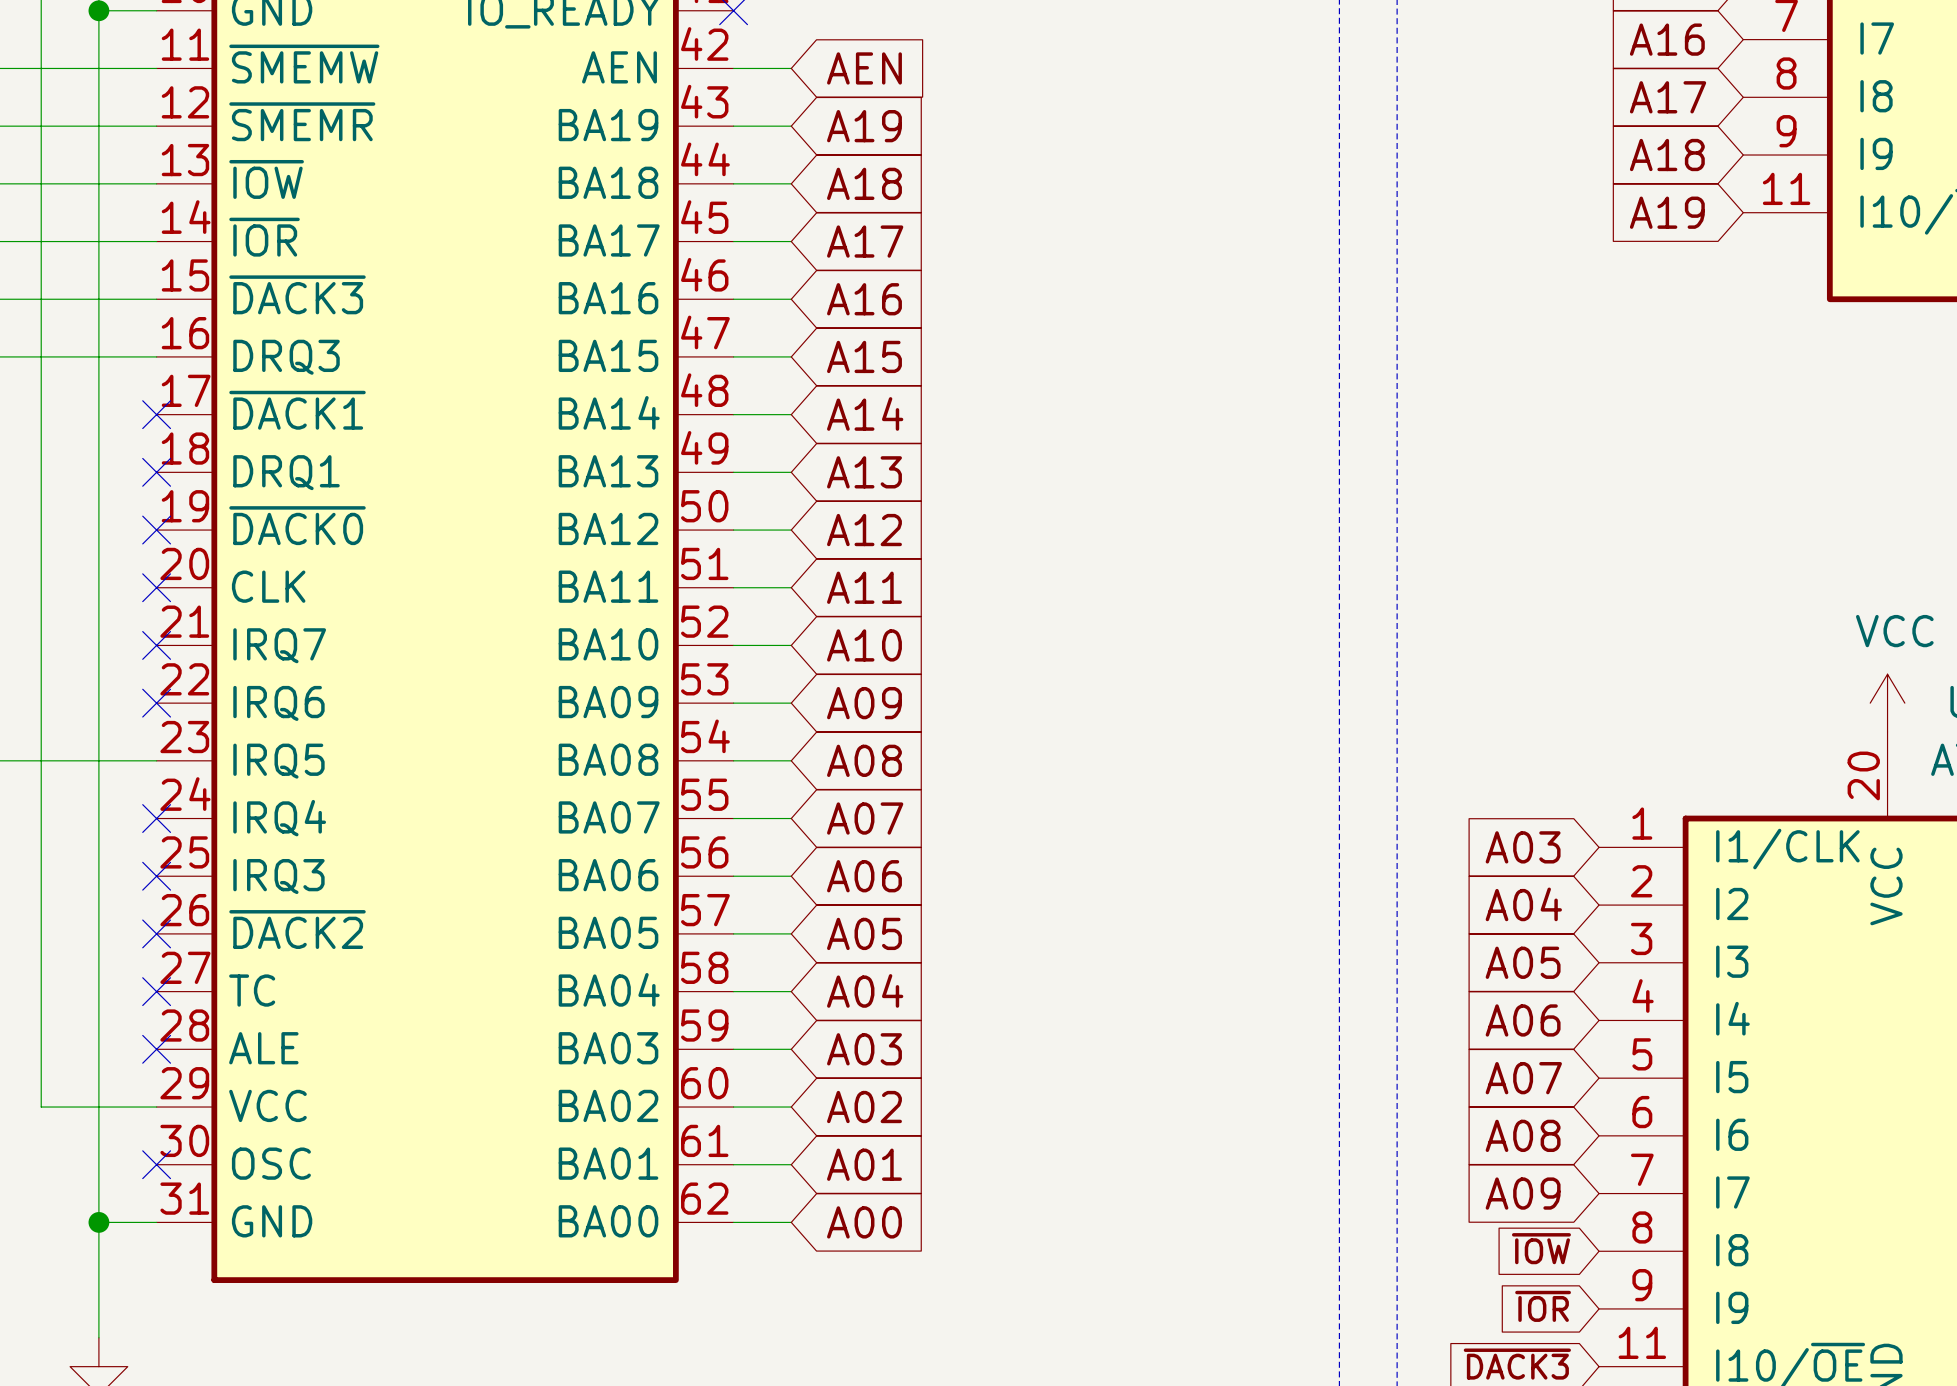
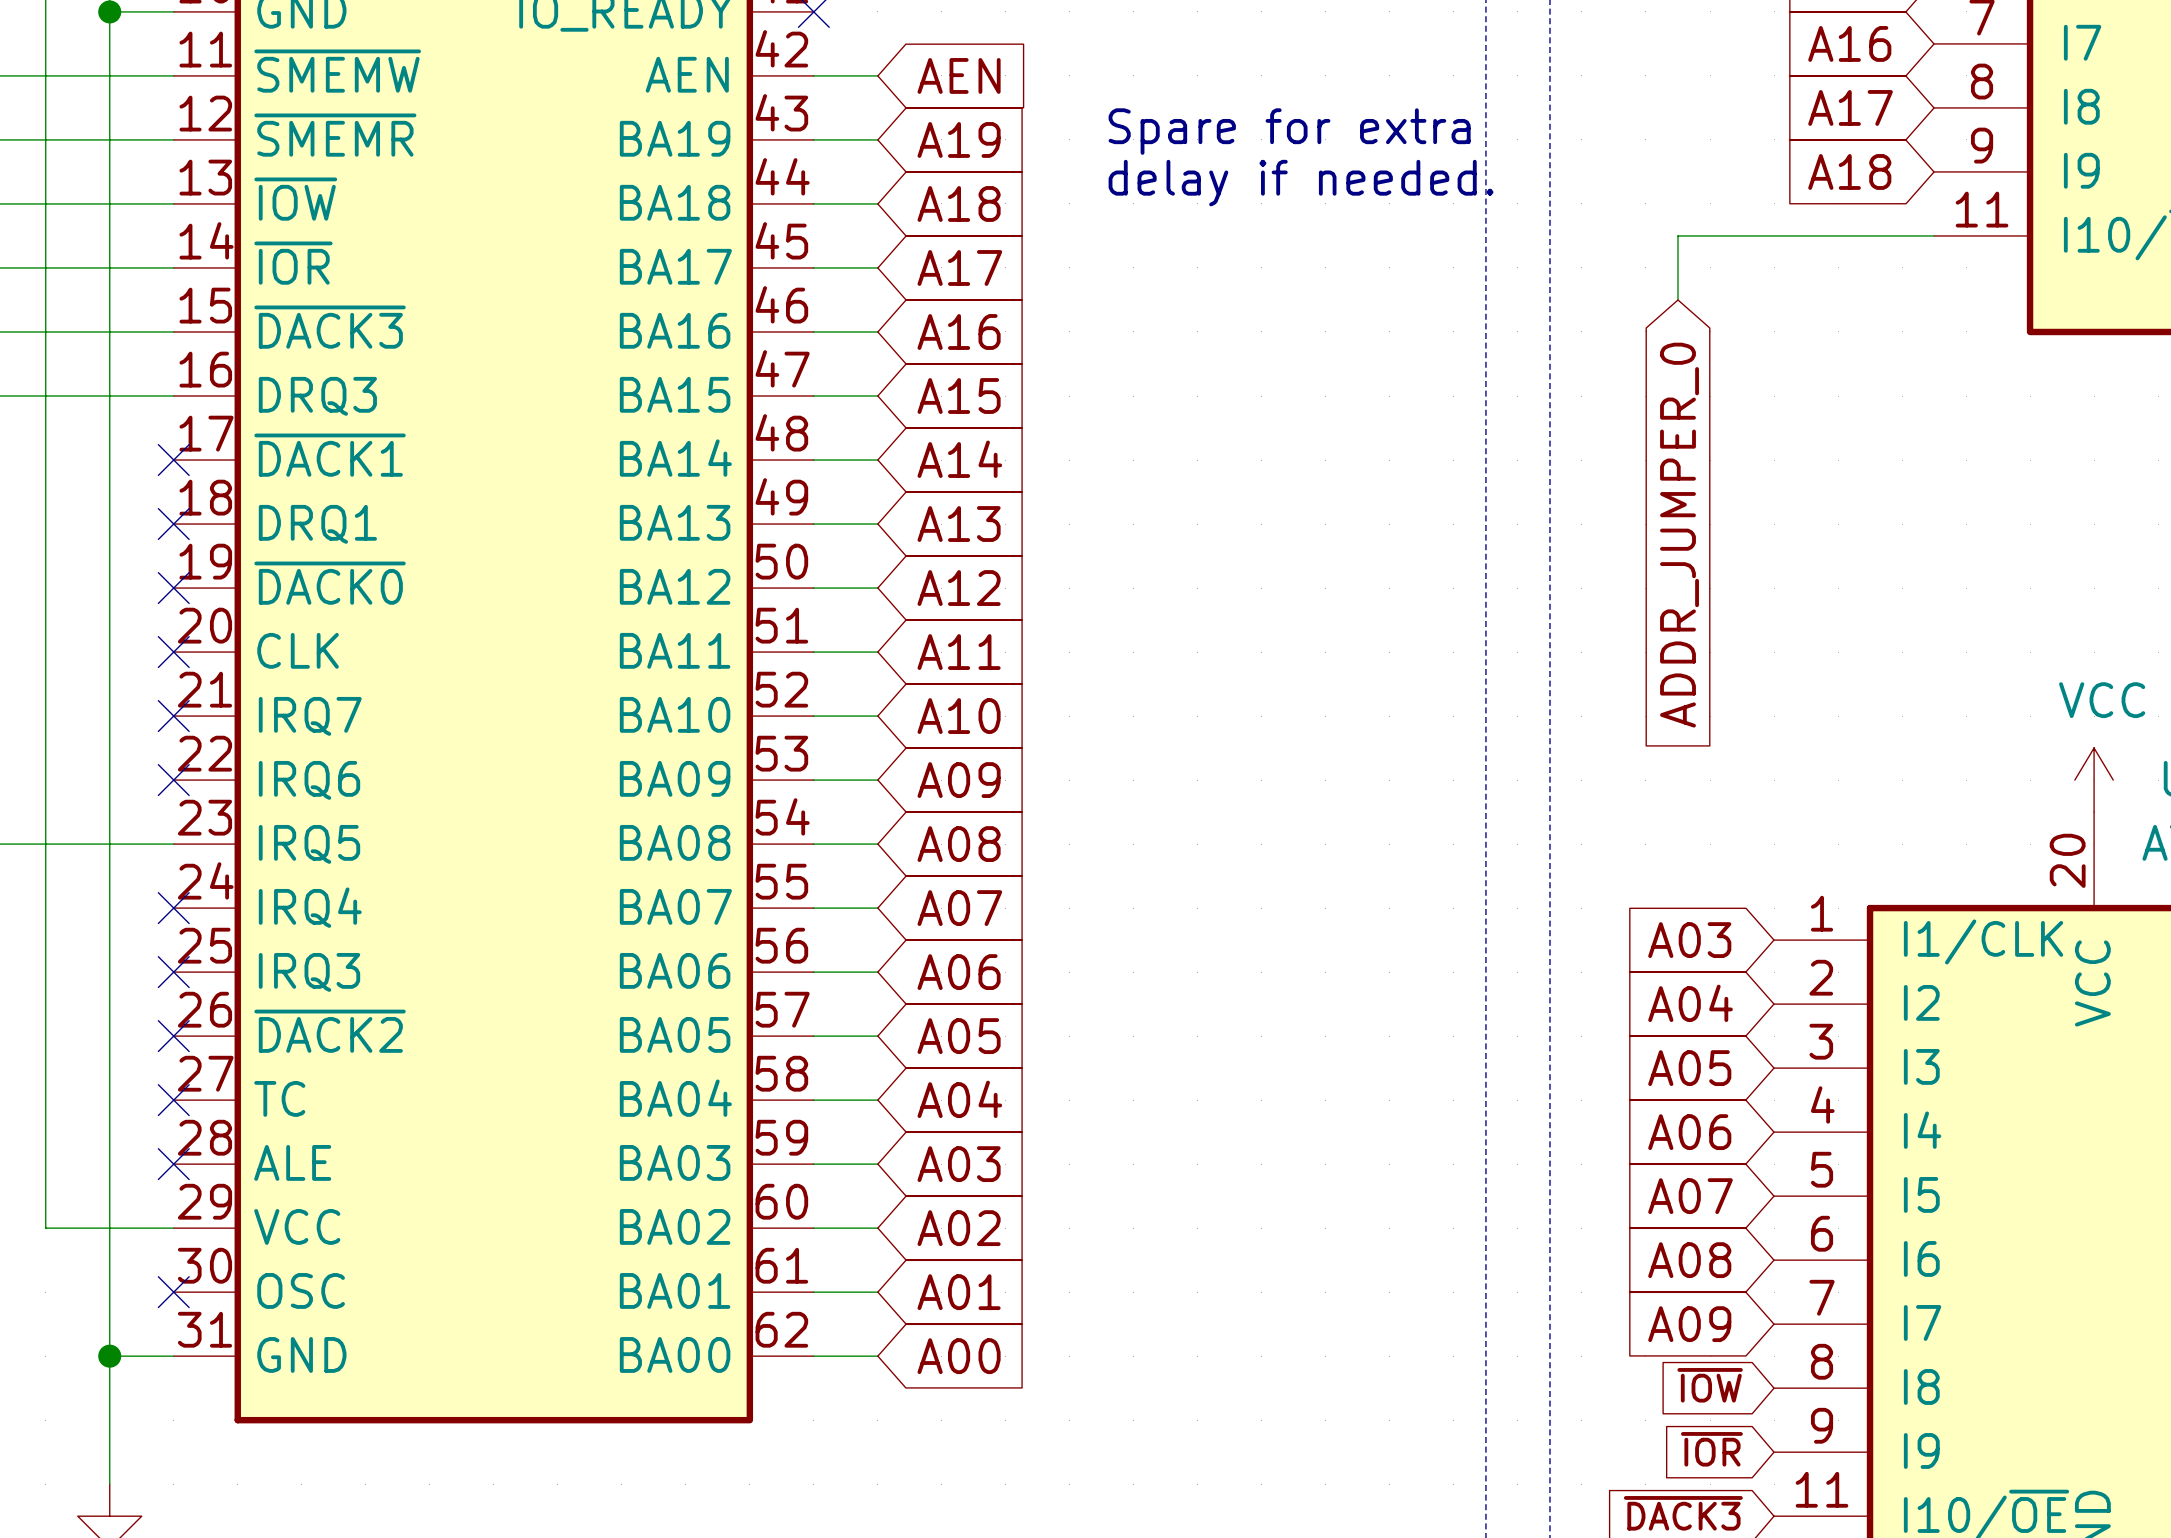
text: none -> Spare for extra (1289, 131)
text: none -> delay if needed. (1301, 183)
global label: A19 (1667, 212) -> none
wire: none -> (1934, 235) (1678, 235) (1678, 299)
global label: none -> ADDR_JUMPER_0 (1679, 535)

